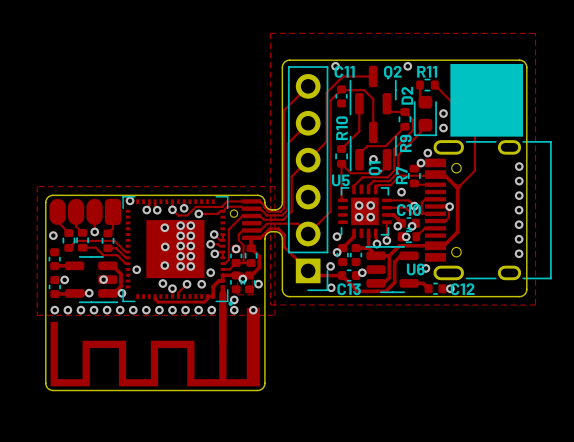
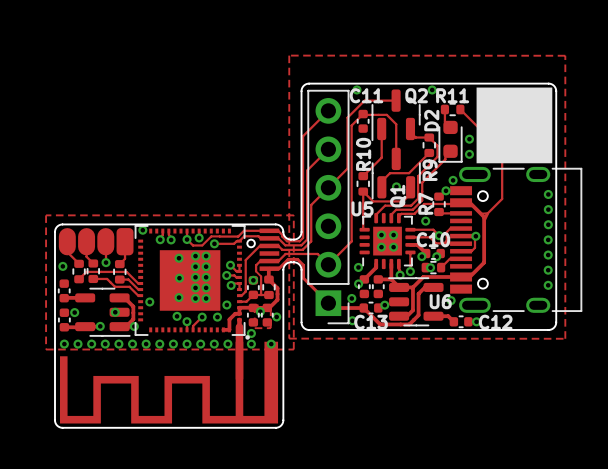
track: (155, 296) (158, 302) (204, 302) (207, 296) -> none

